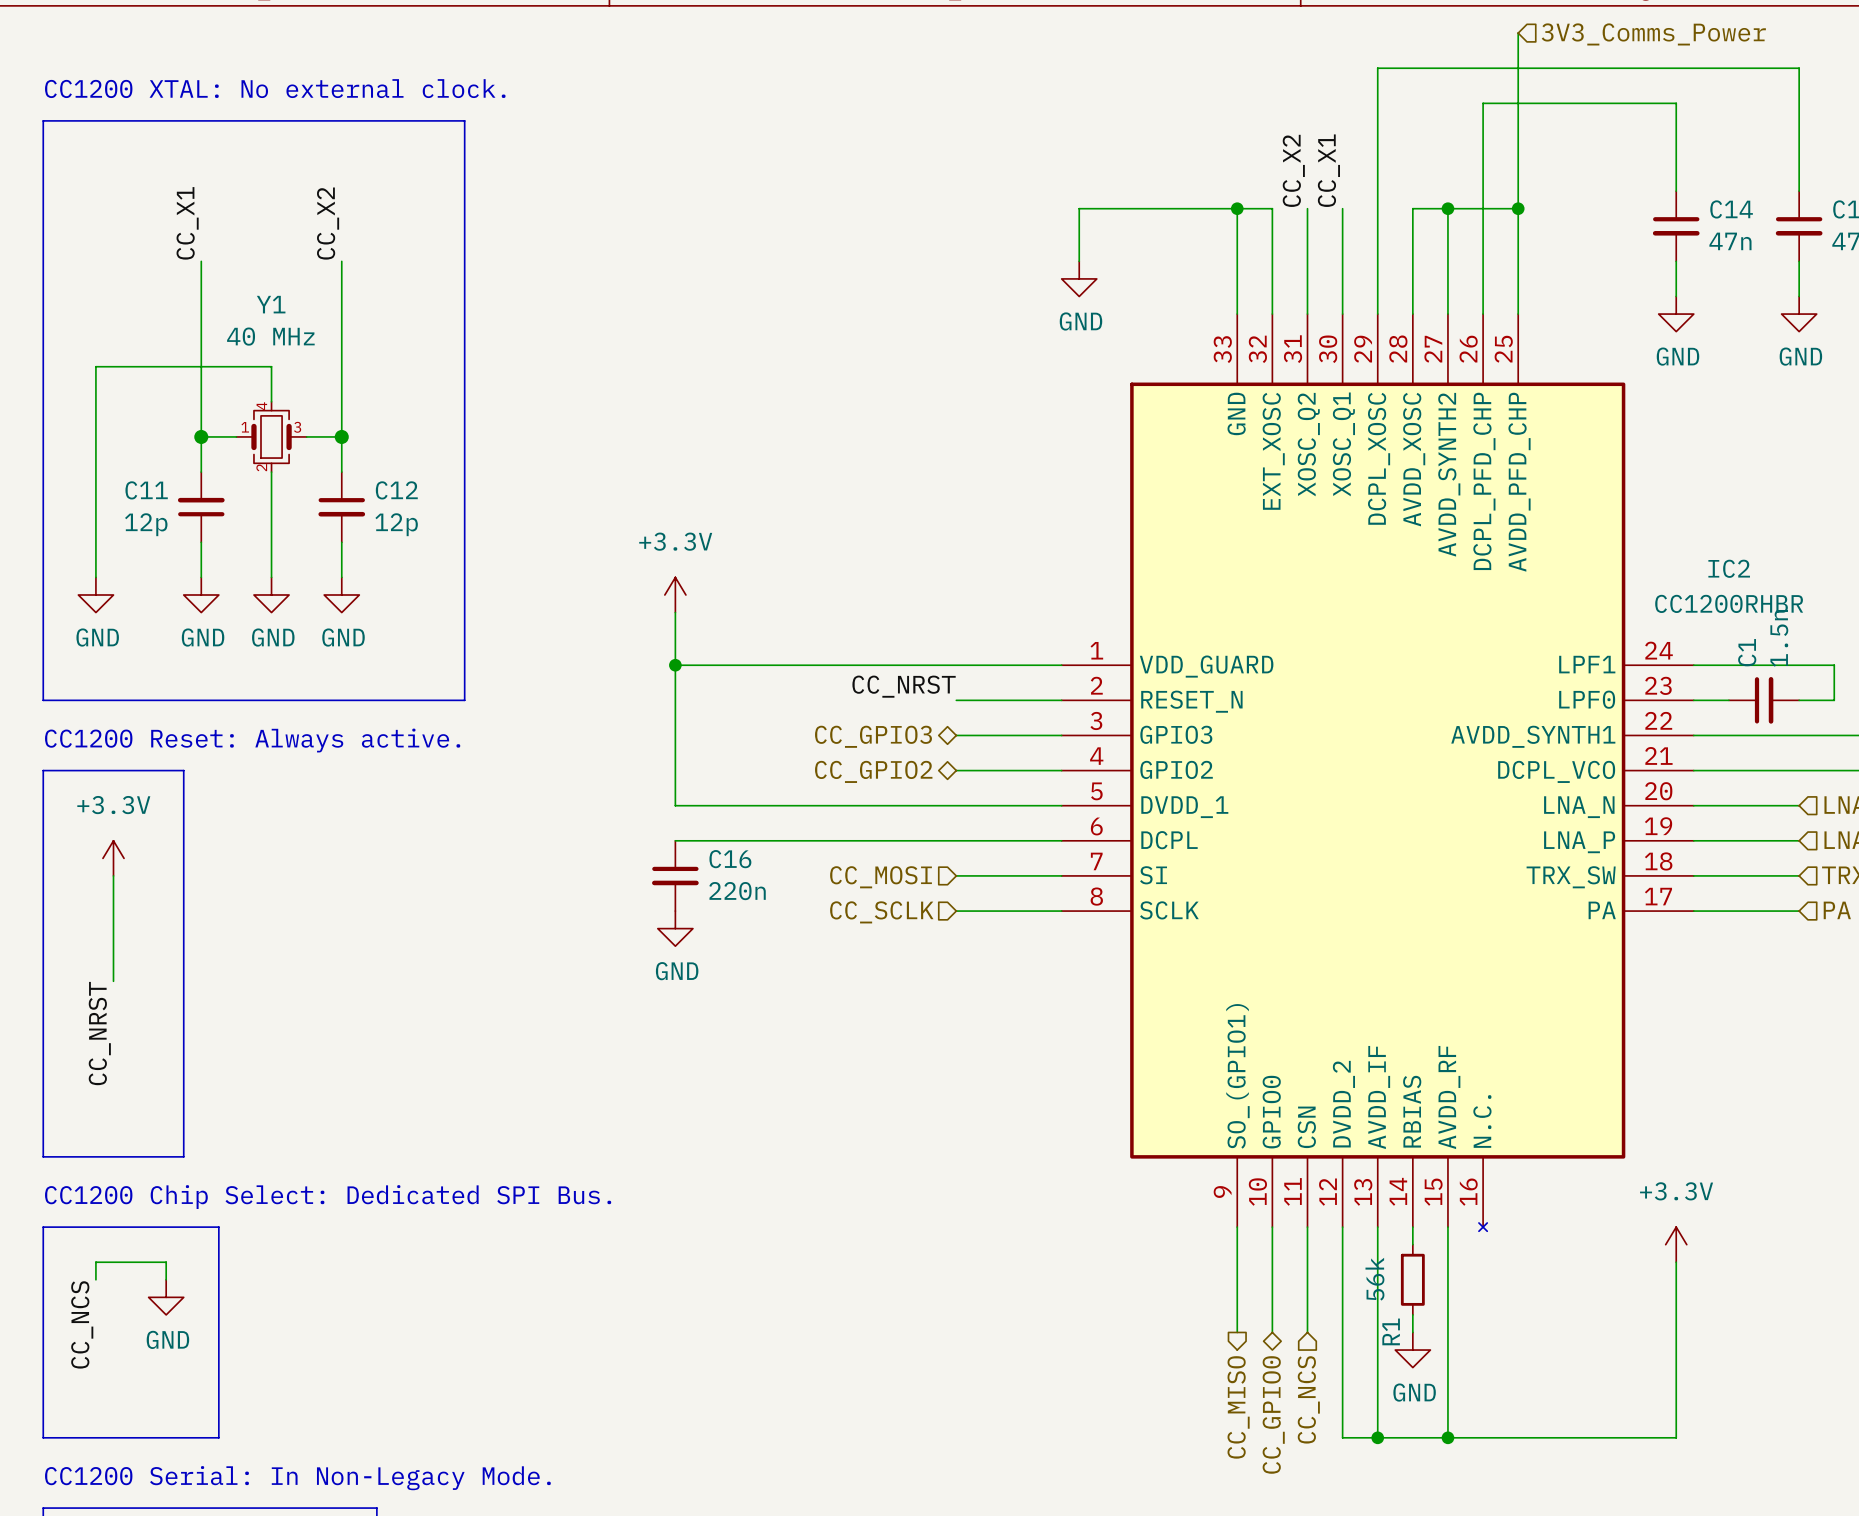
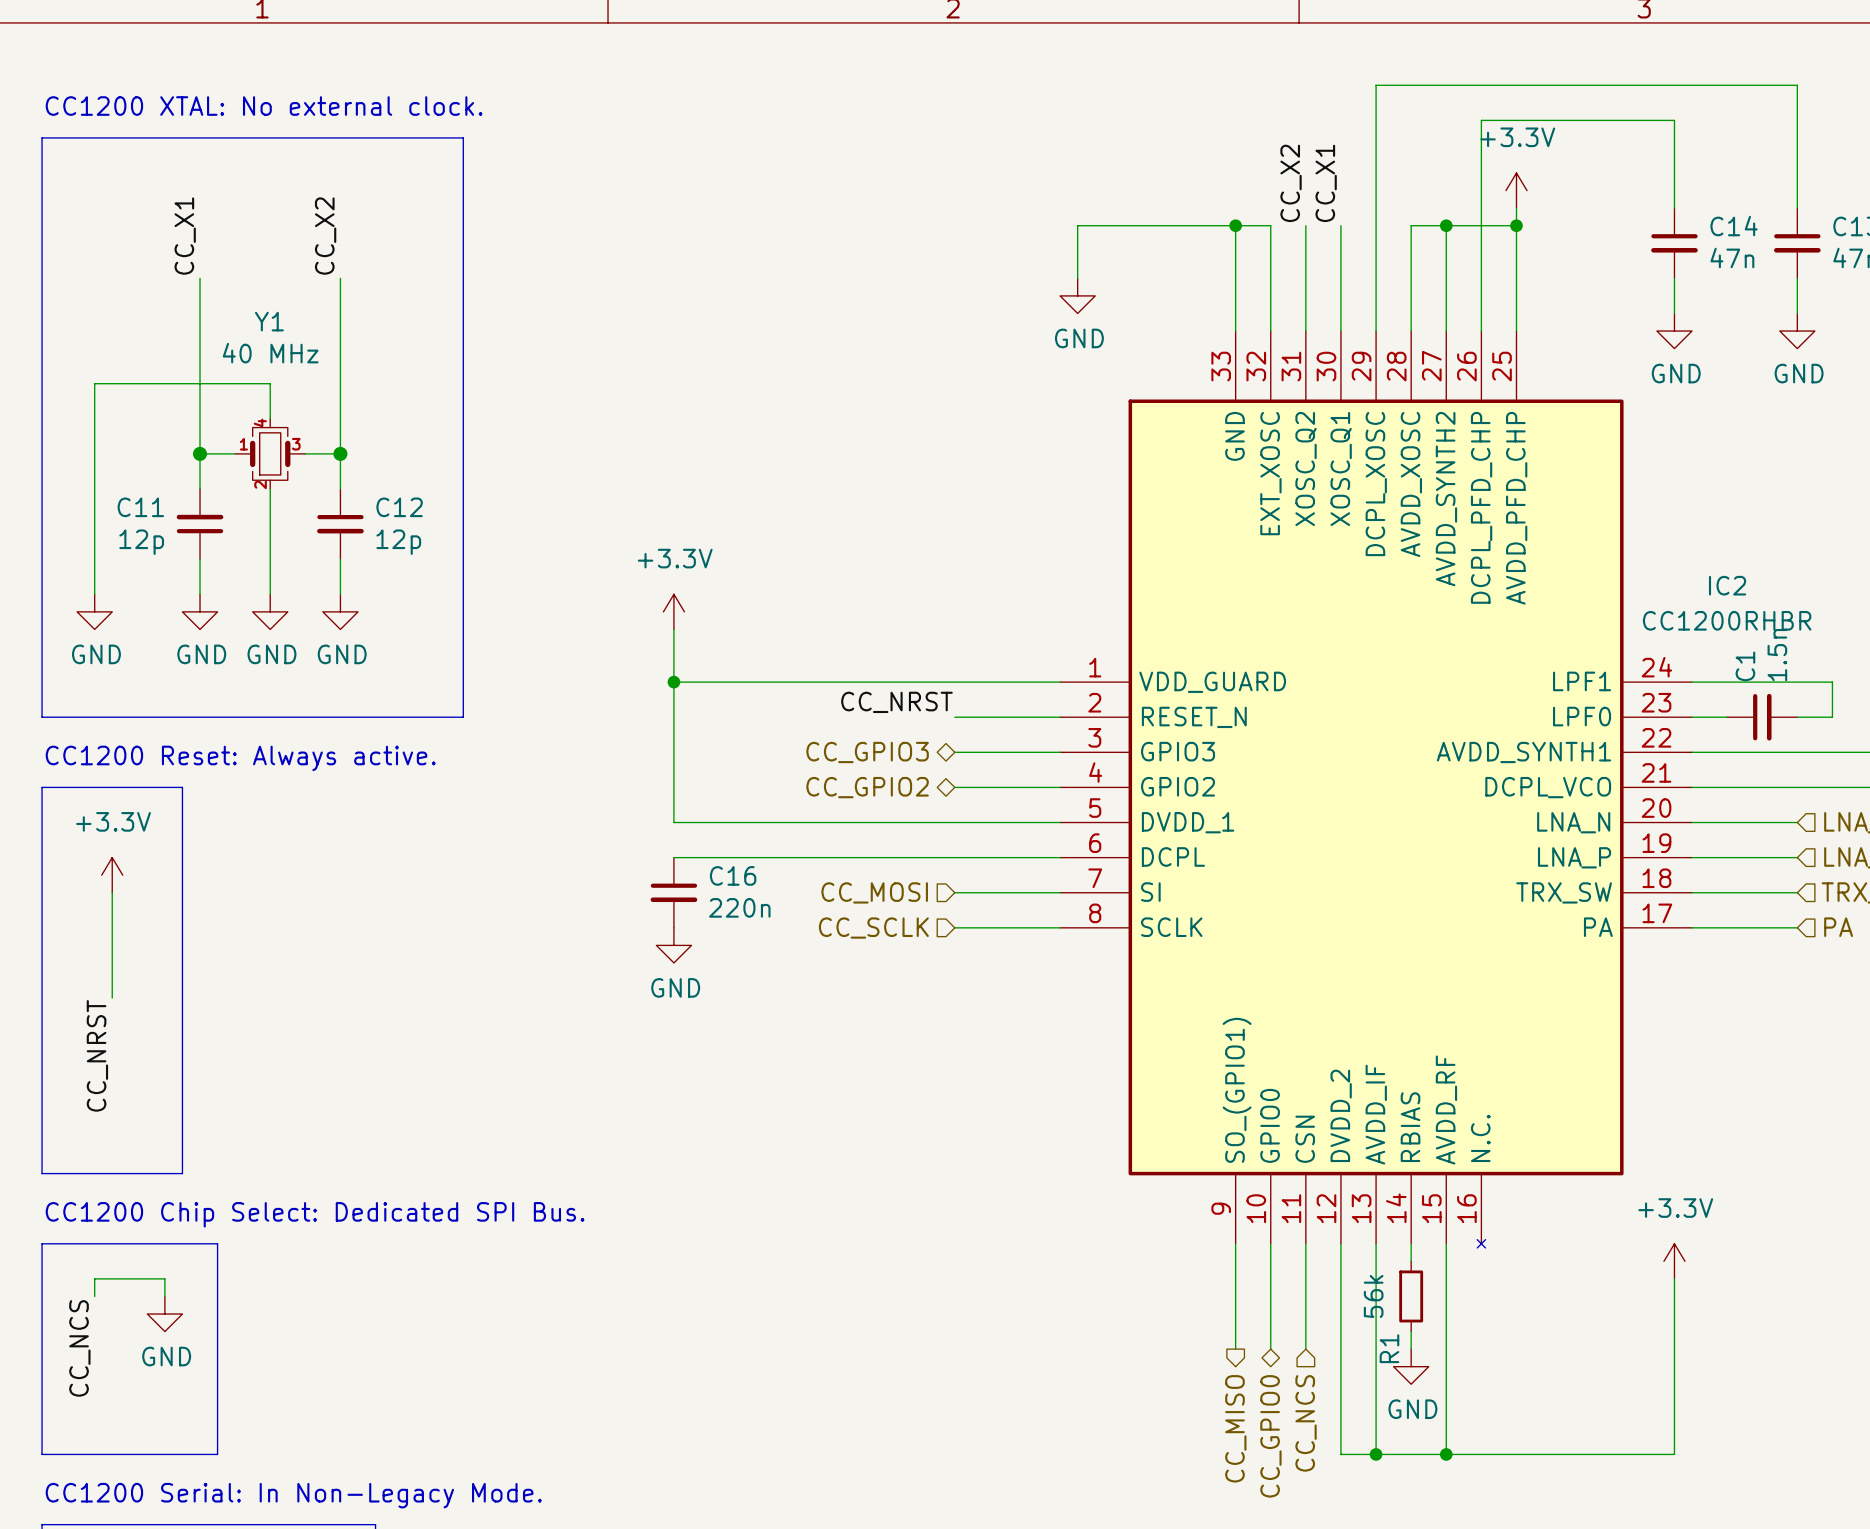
wire: (1518, 33) (1518, 191) -> none
hierarchical label: 3V3_Comms_Power (1653, 34) -> none
power symbol: none -> +3.3V (1516, 190)

